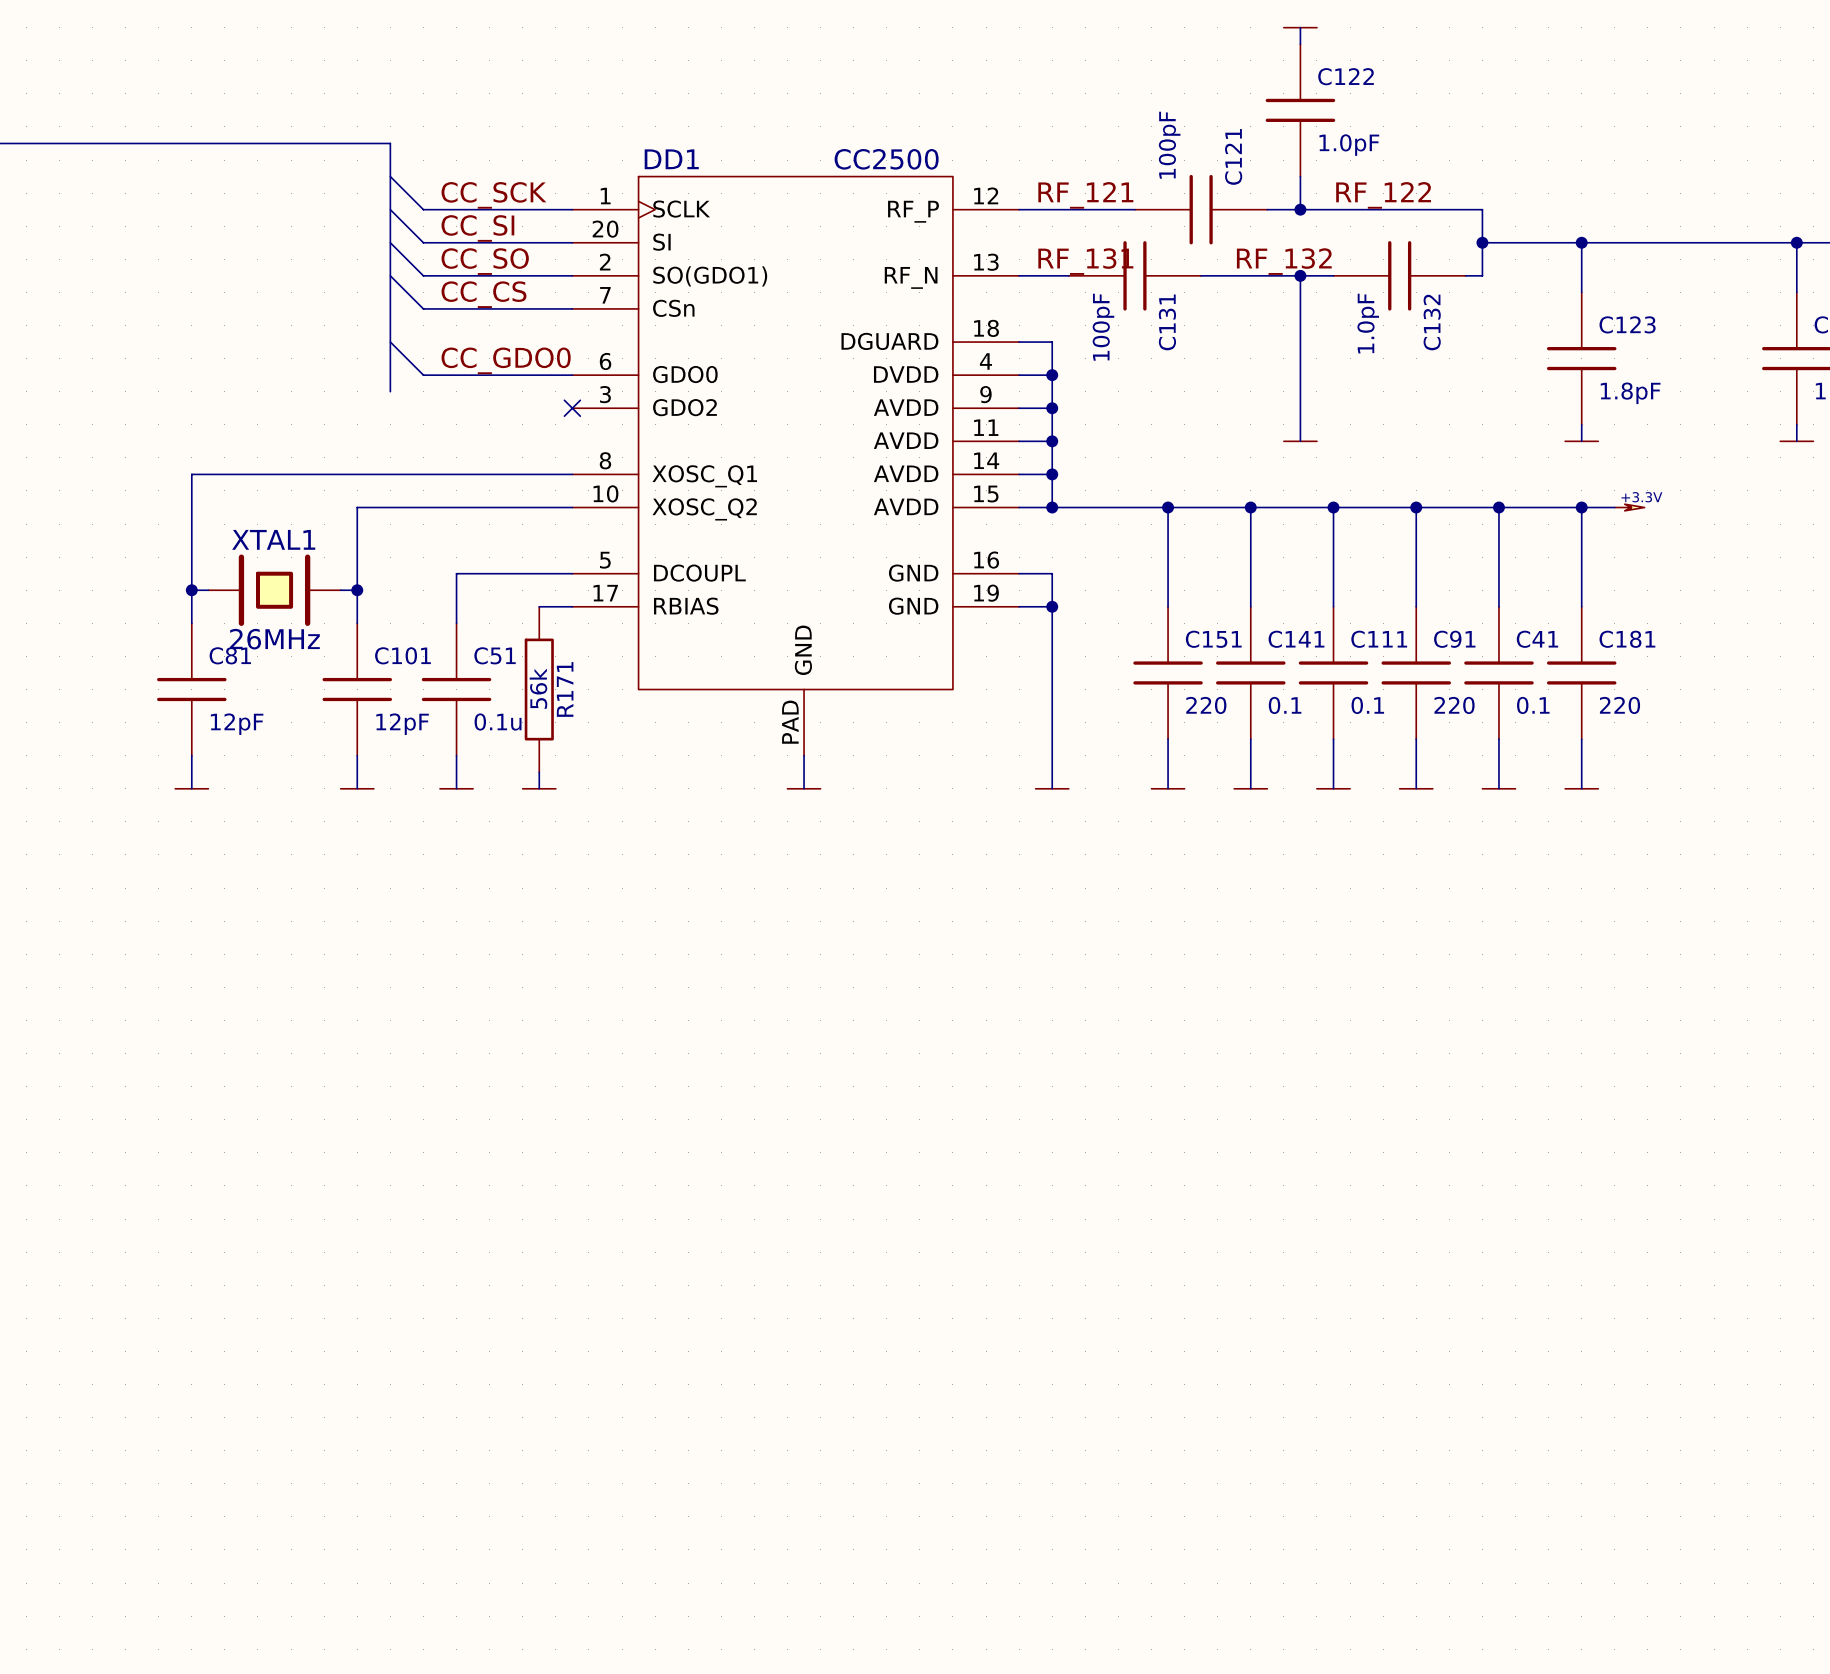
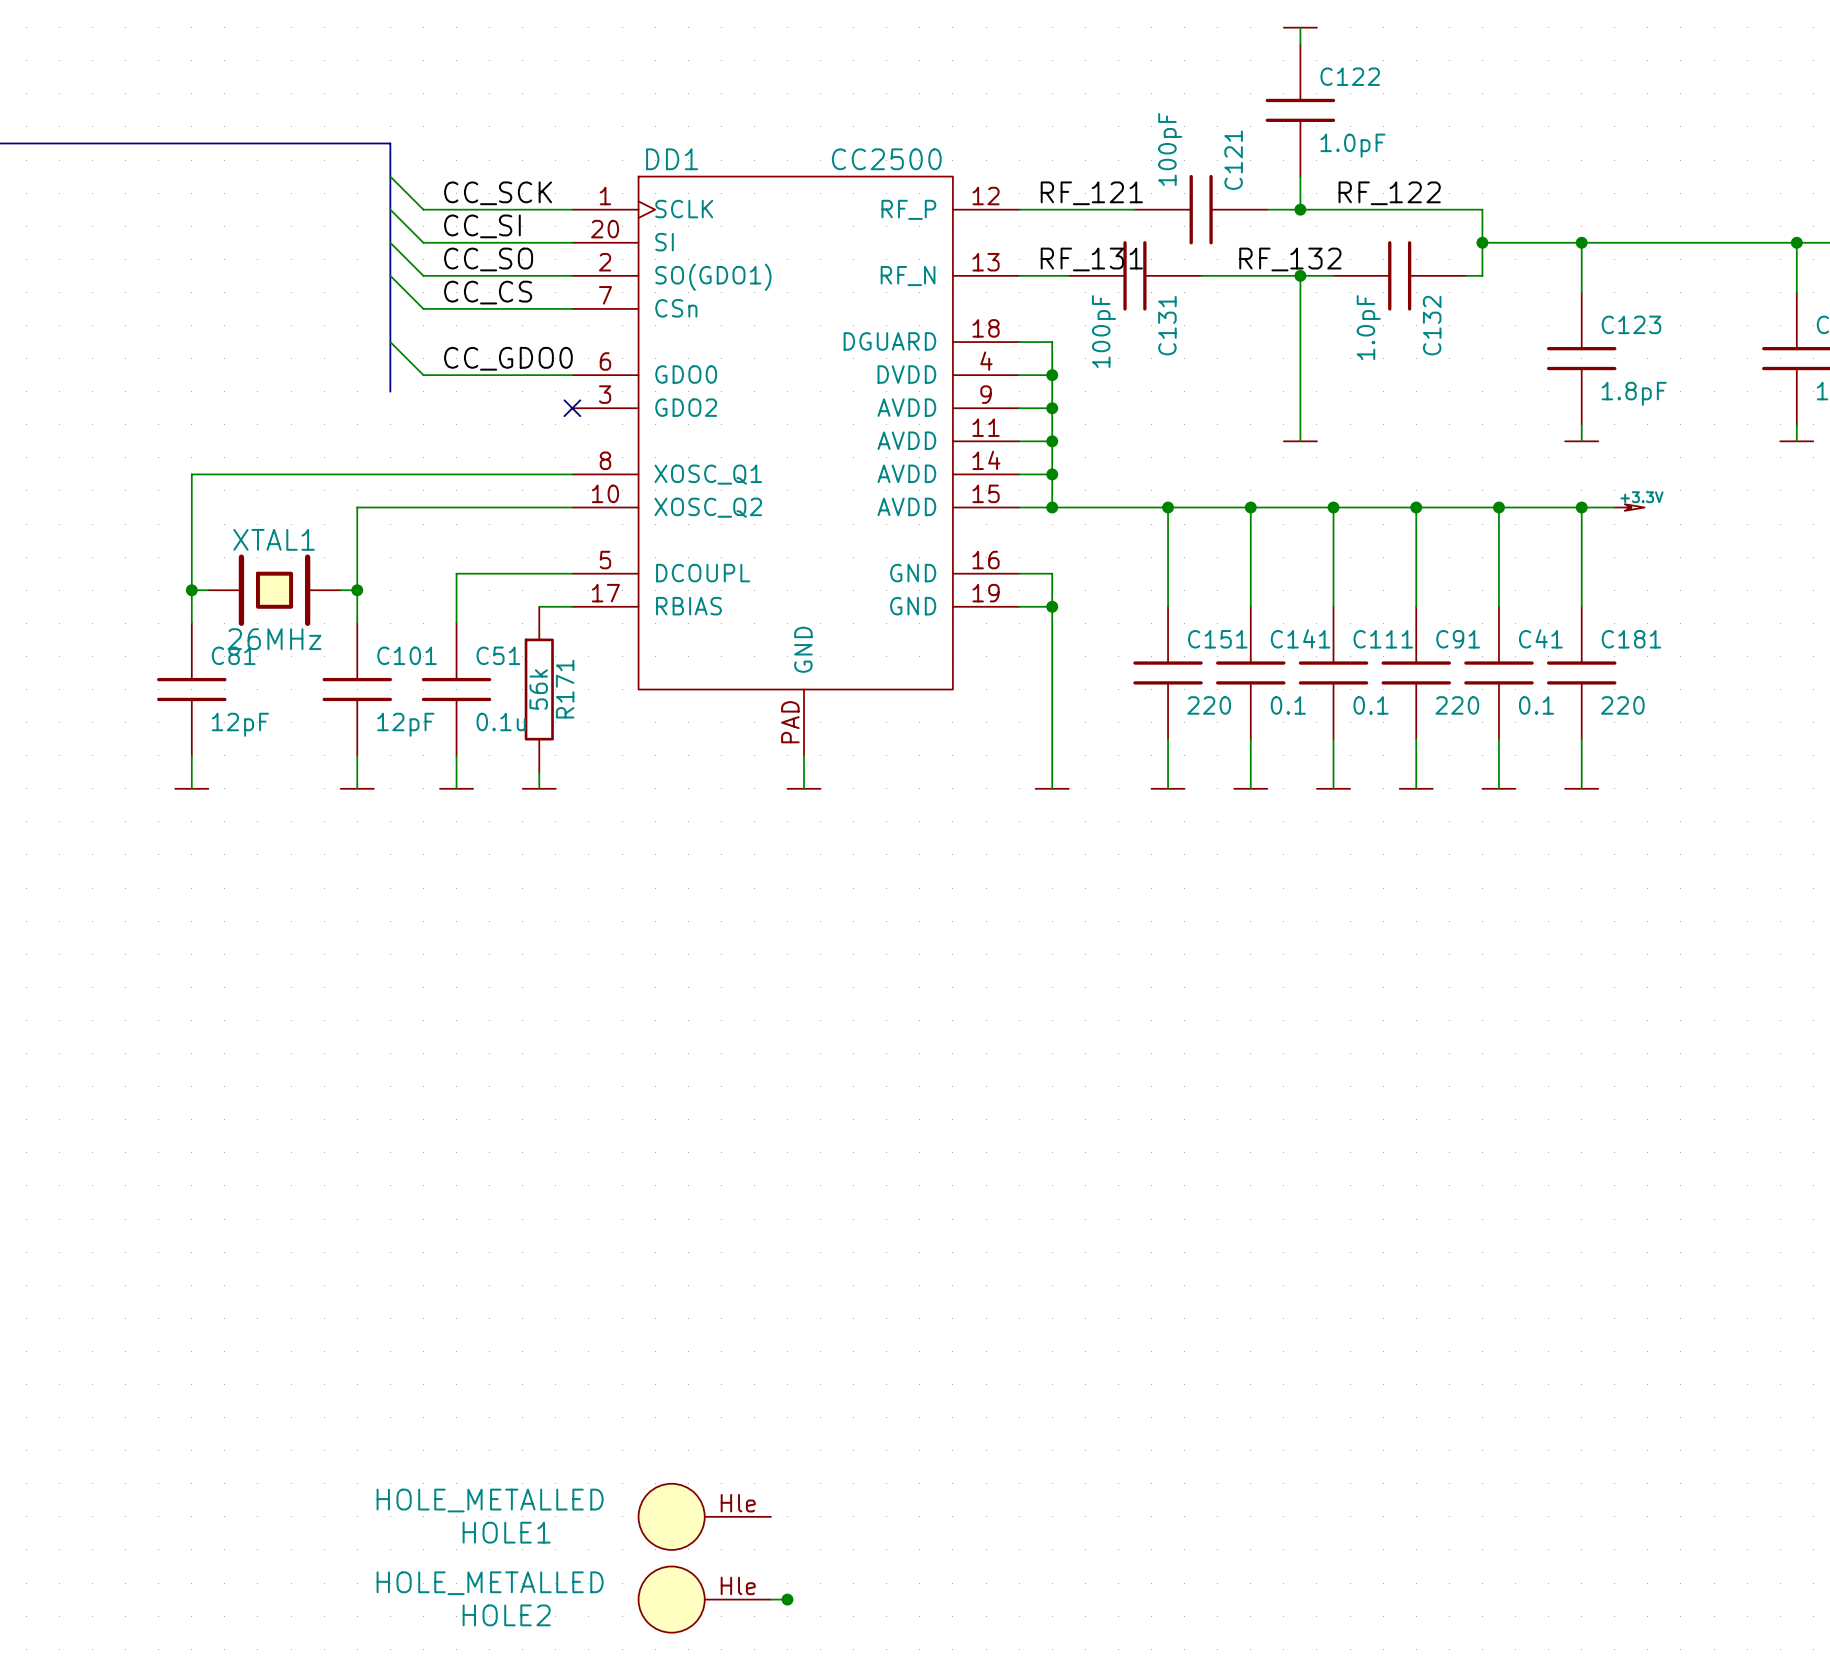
HOLE1: none -> HOLE_METALLED (704, 1516)
HOLE2: none -> HOLE_METALLED (704, 1599)
wire: none -> (770, 1599) (787, 1599)
junction: none -> (787, 1599)

